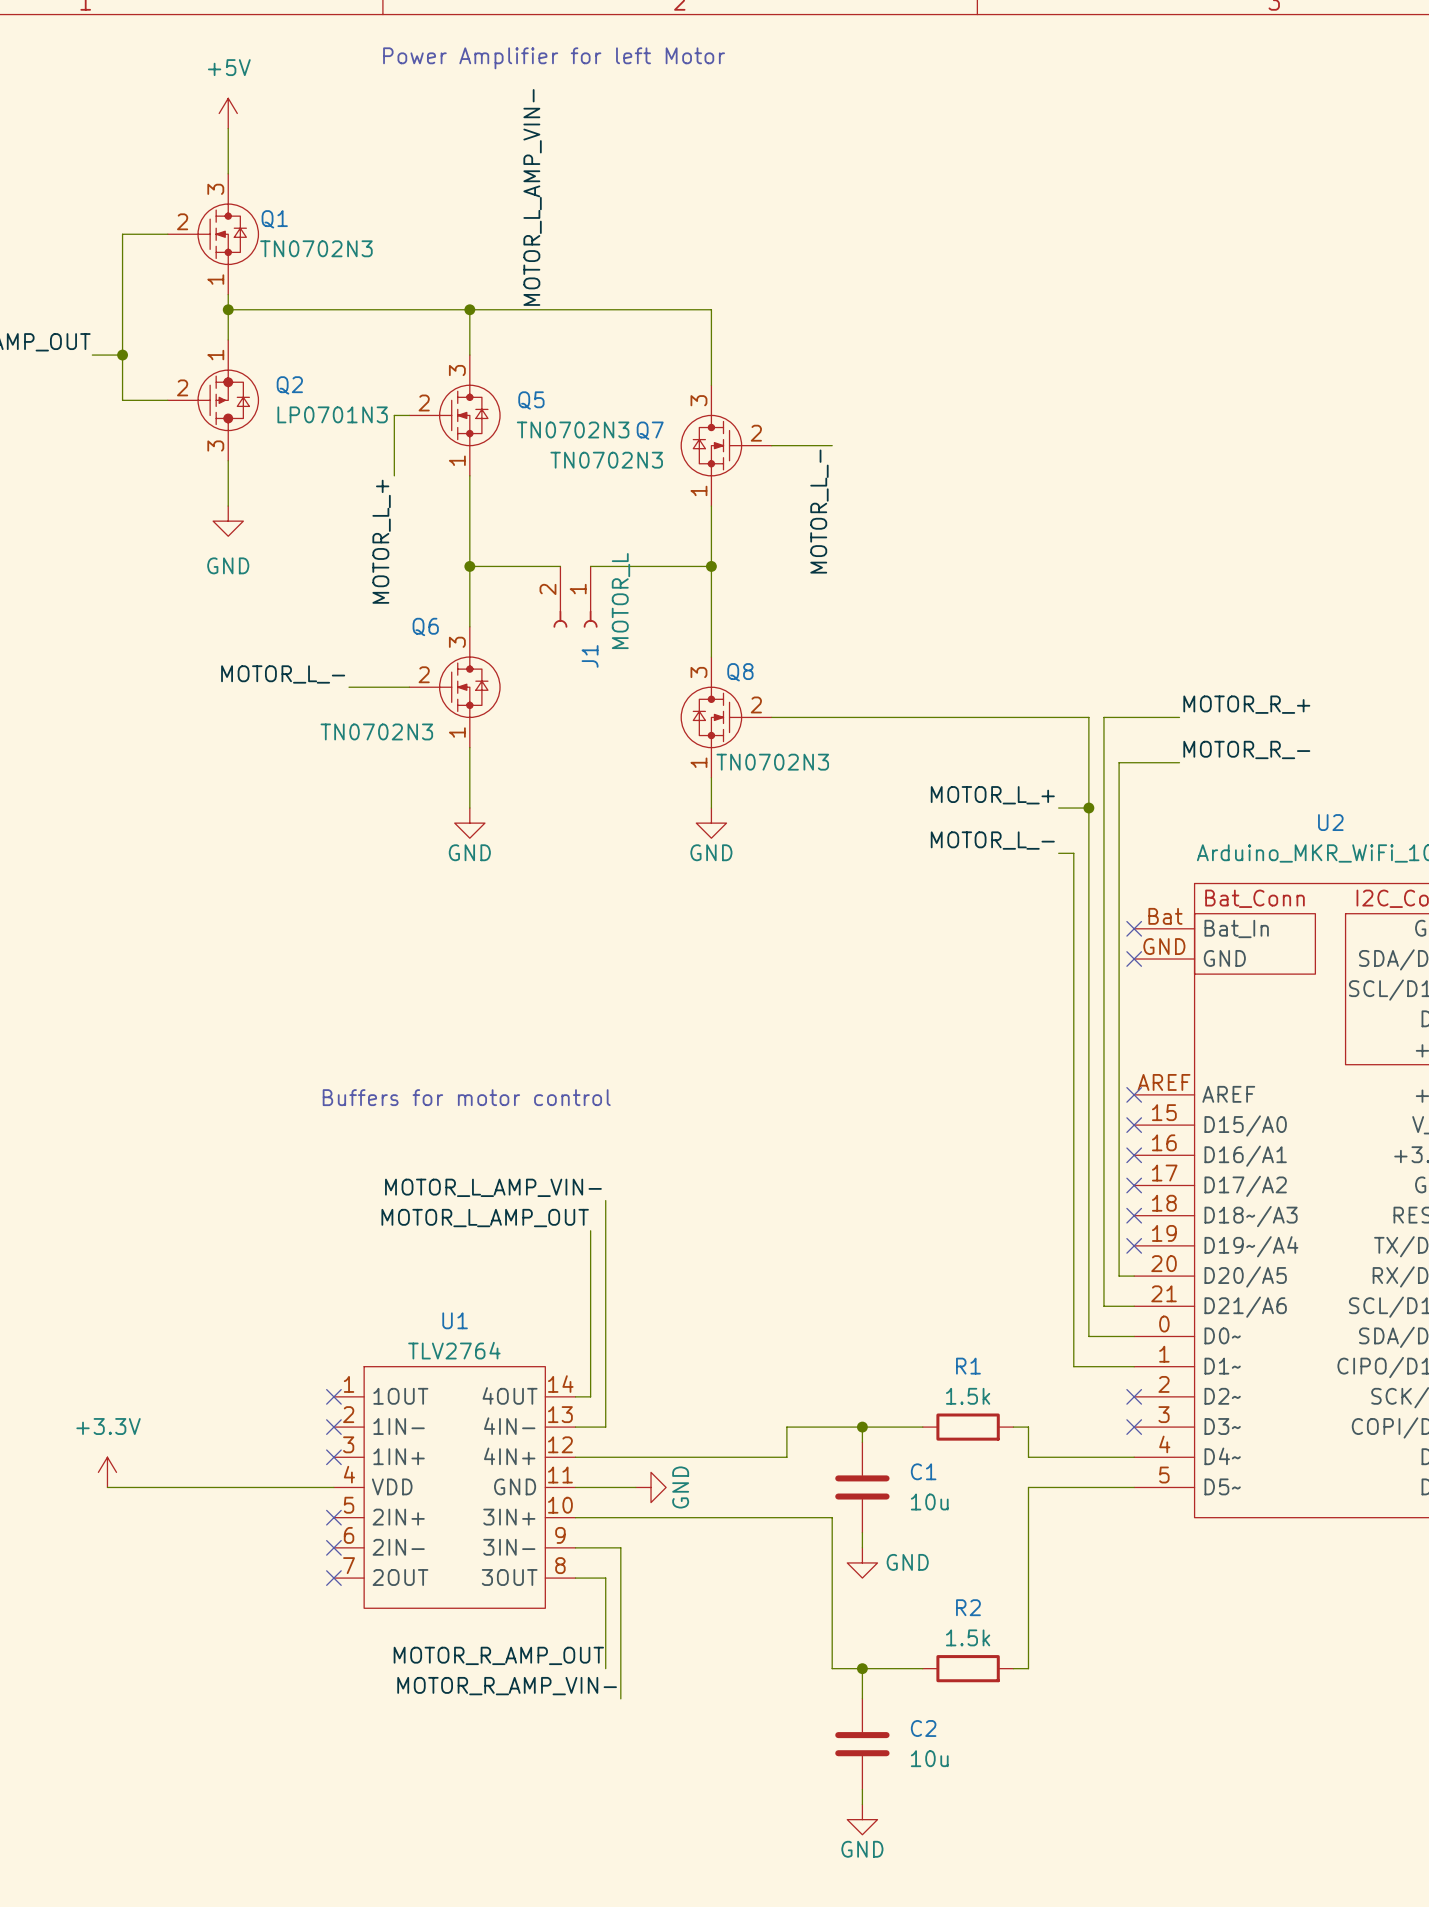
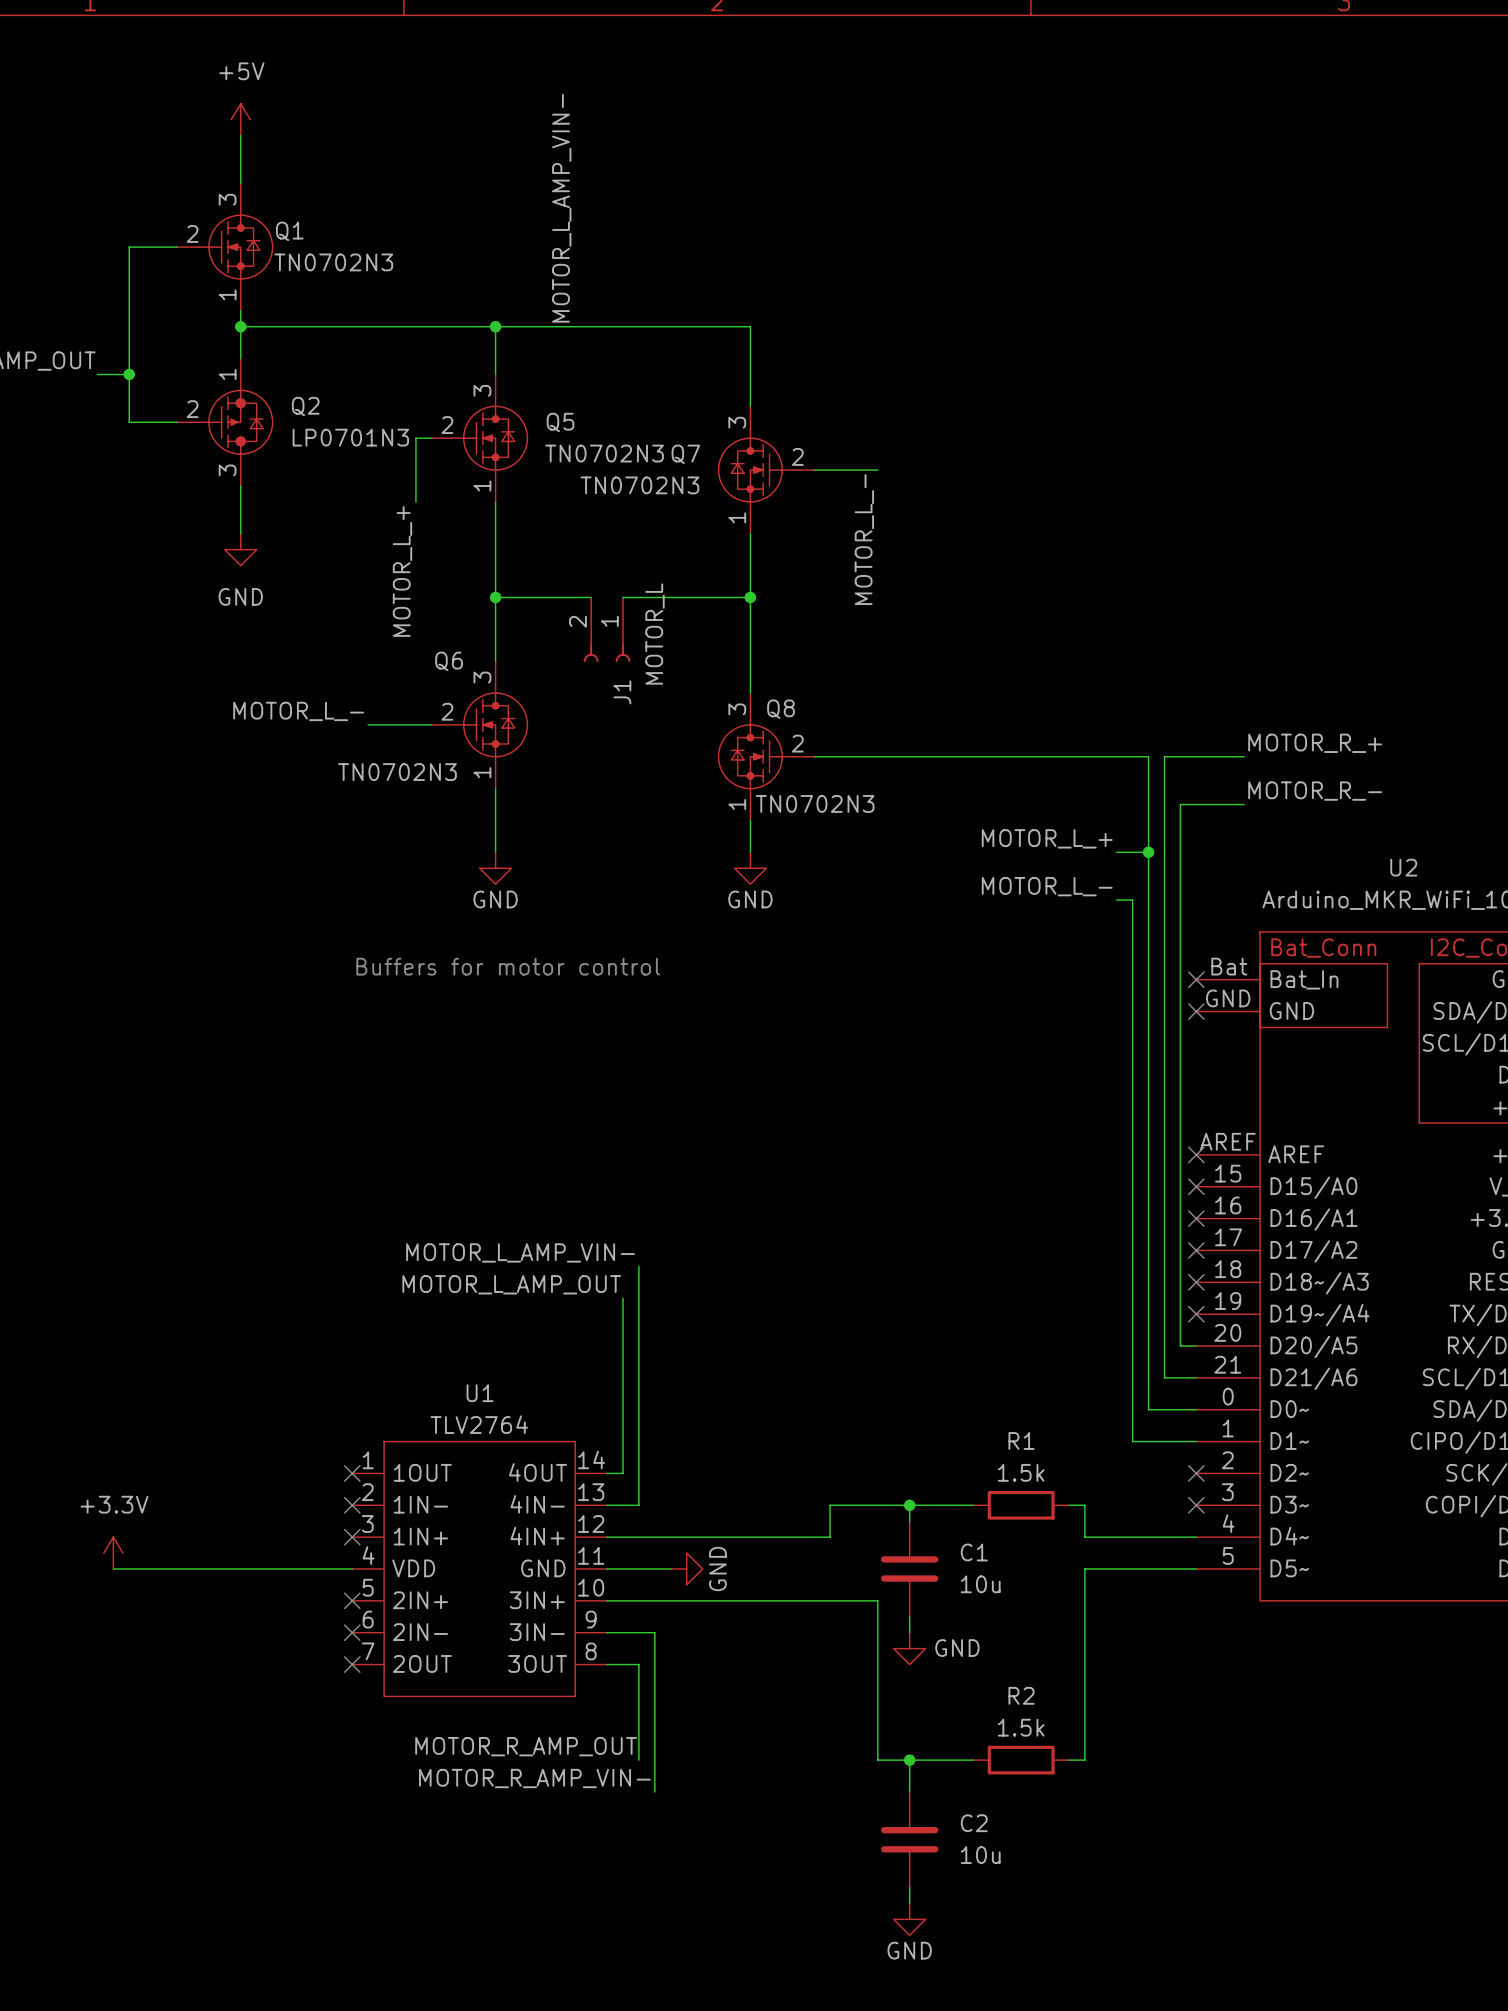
text: Power Amplifier for left Motor (554, 58) -> none
text position: Buffers for motor control (466, 1097) -> Buffers for motor control (508, 966)

